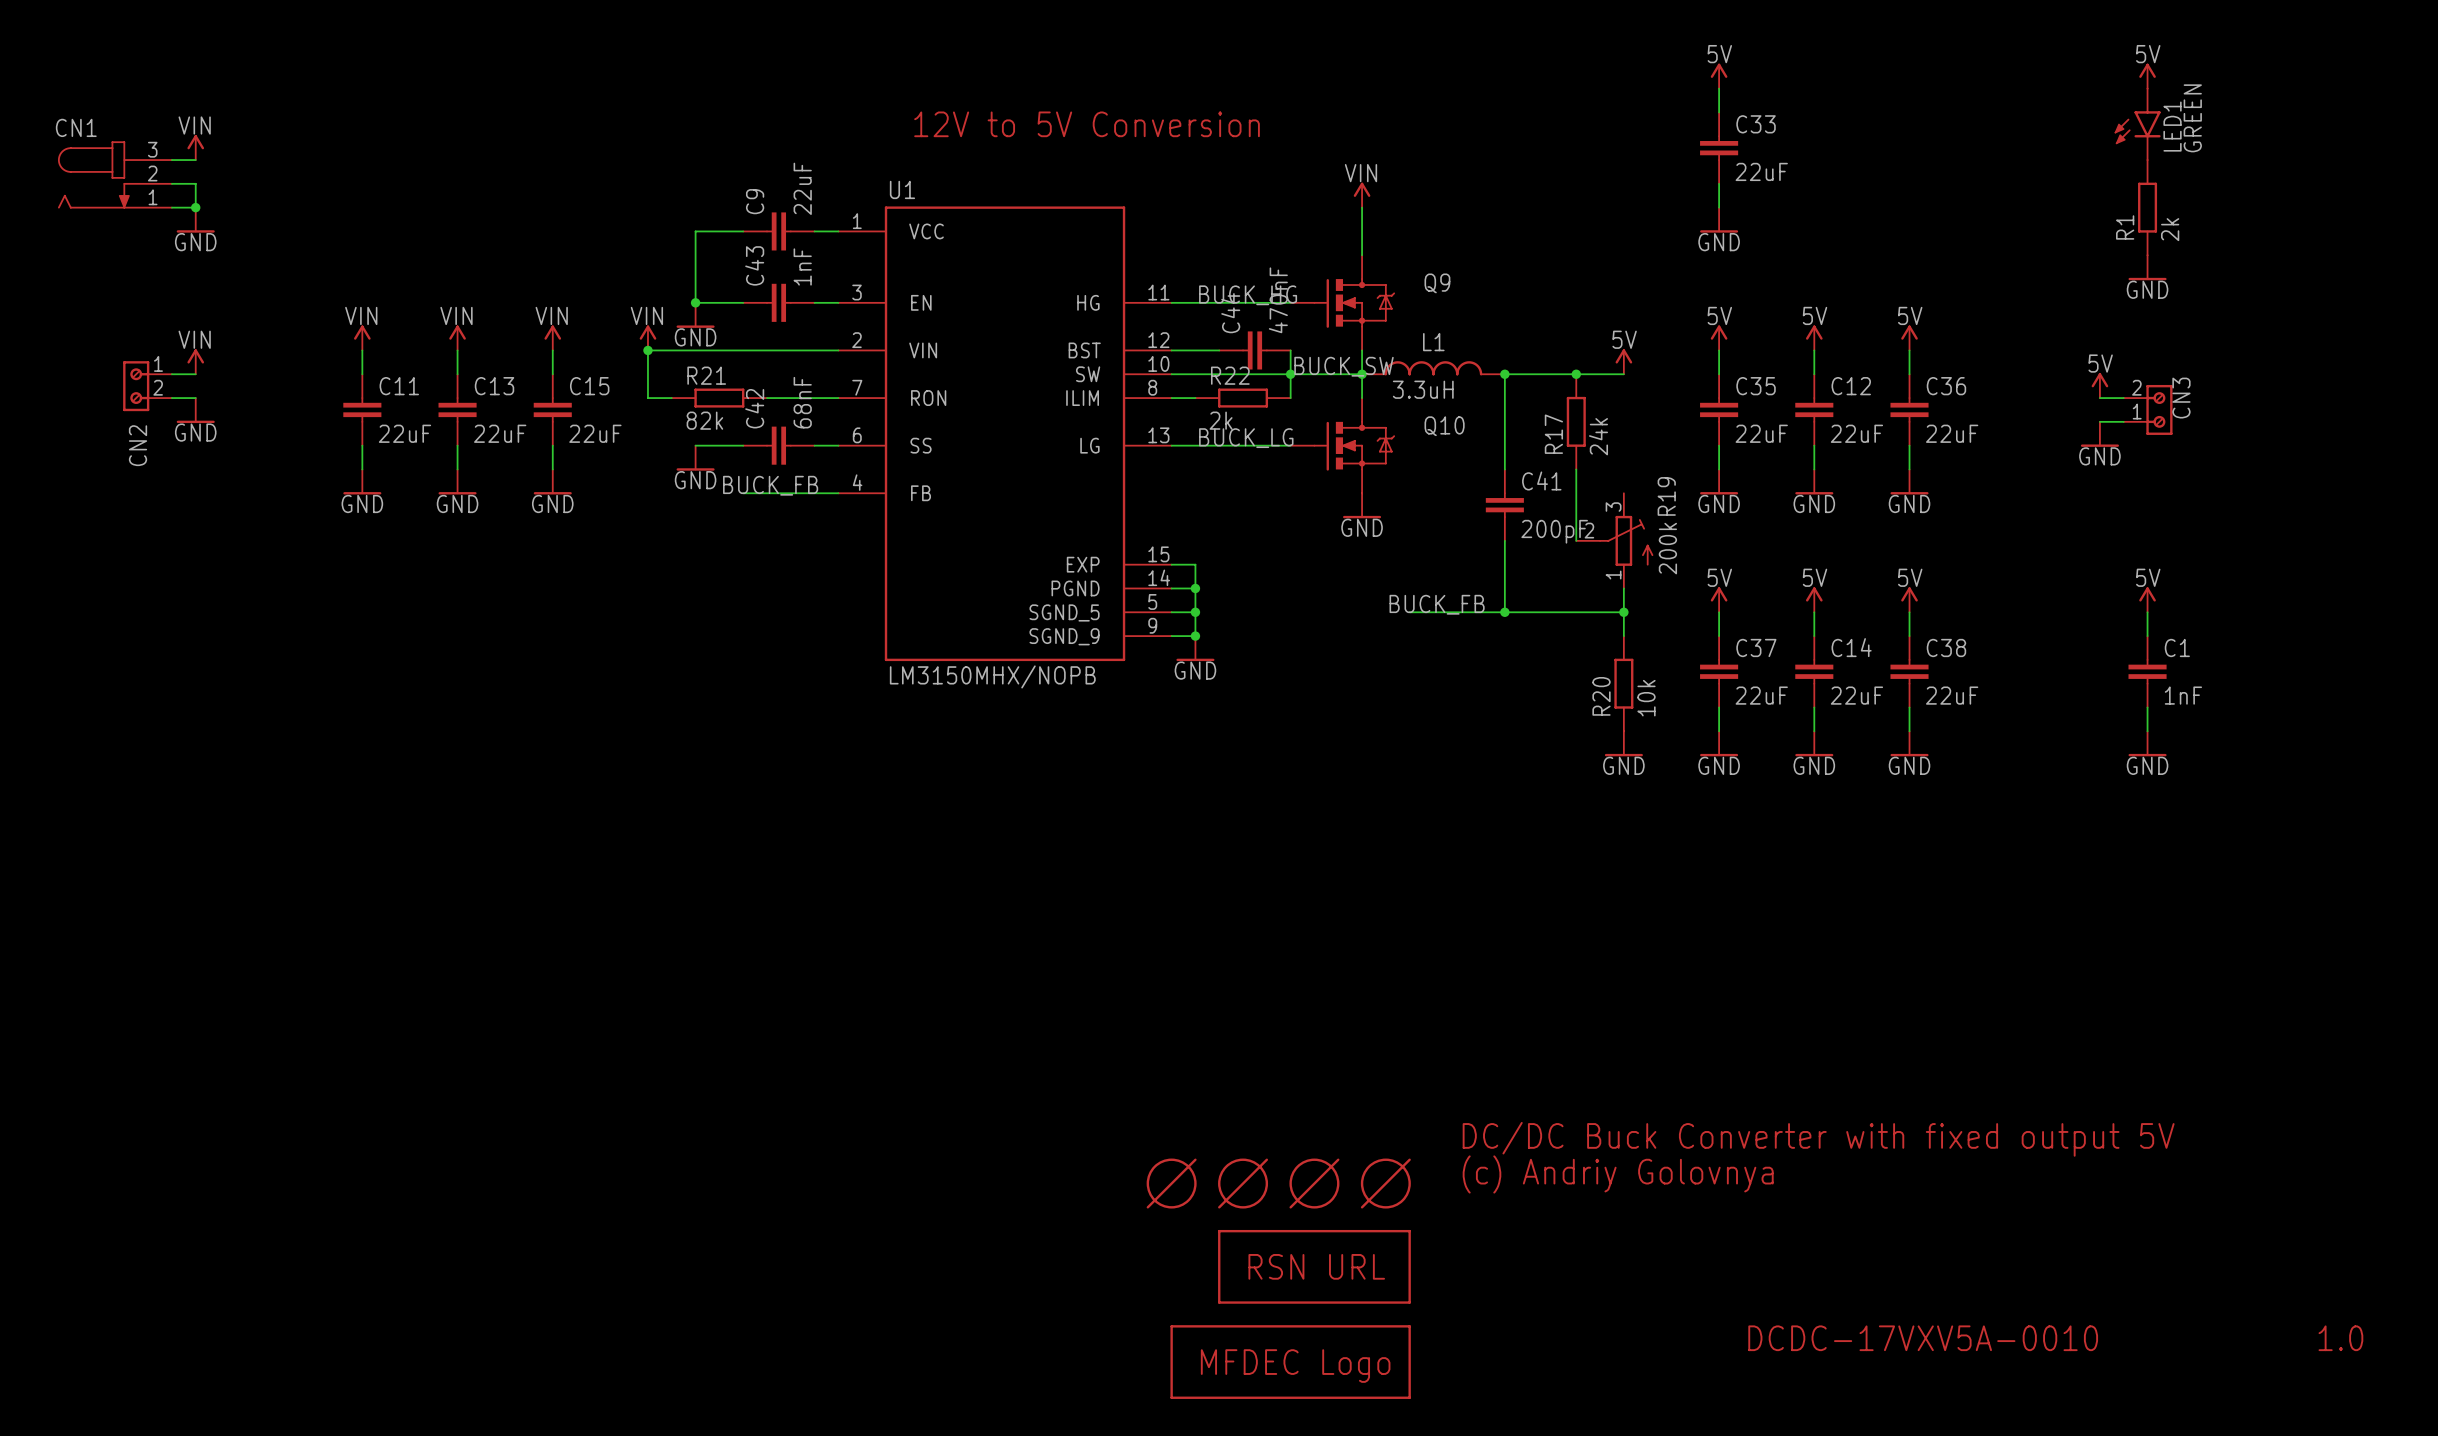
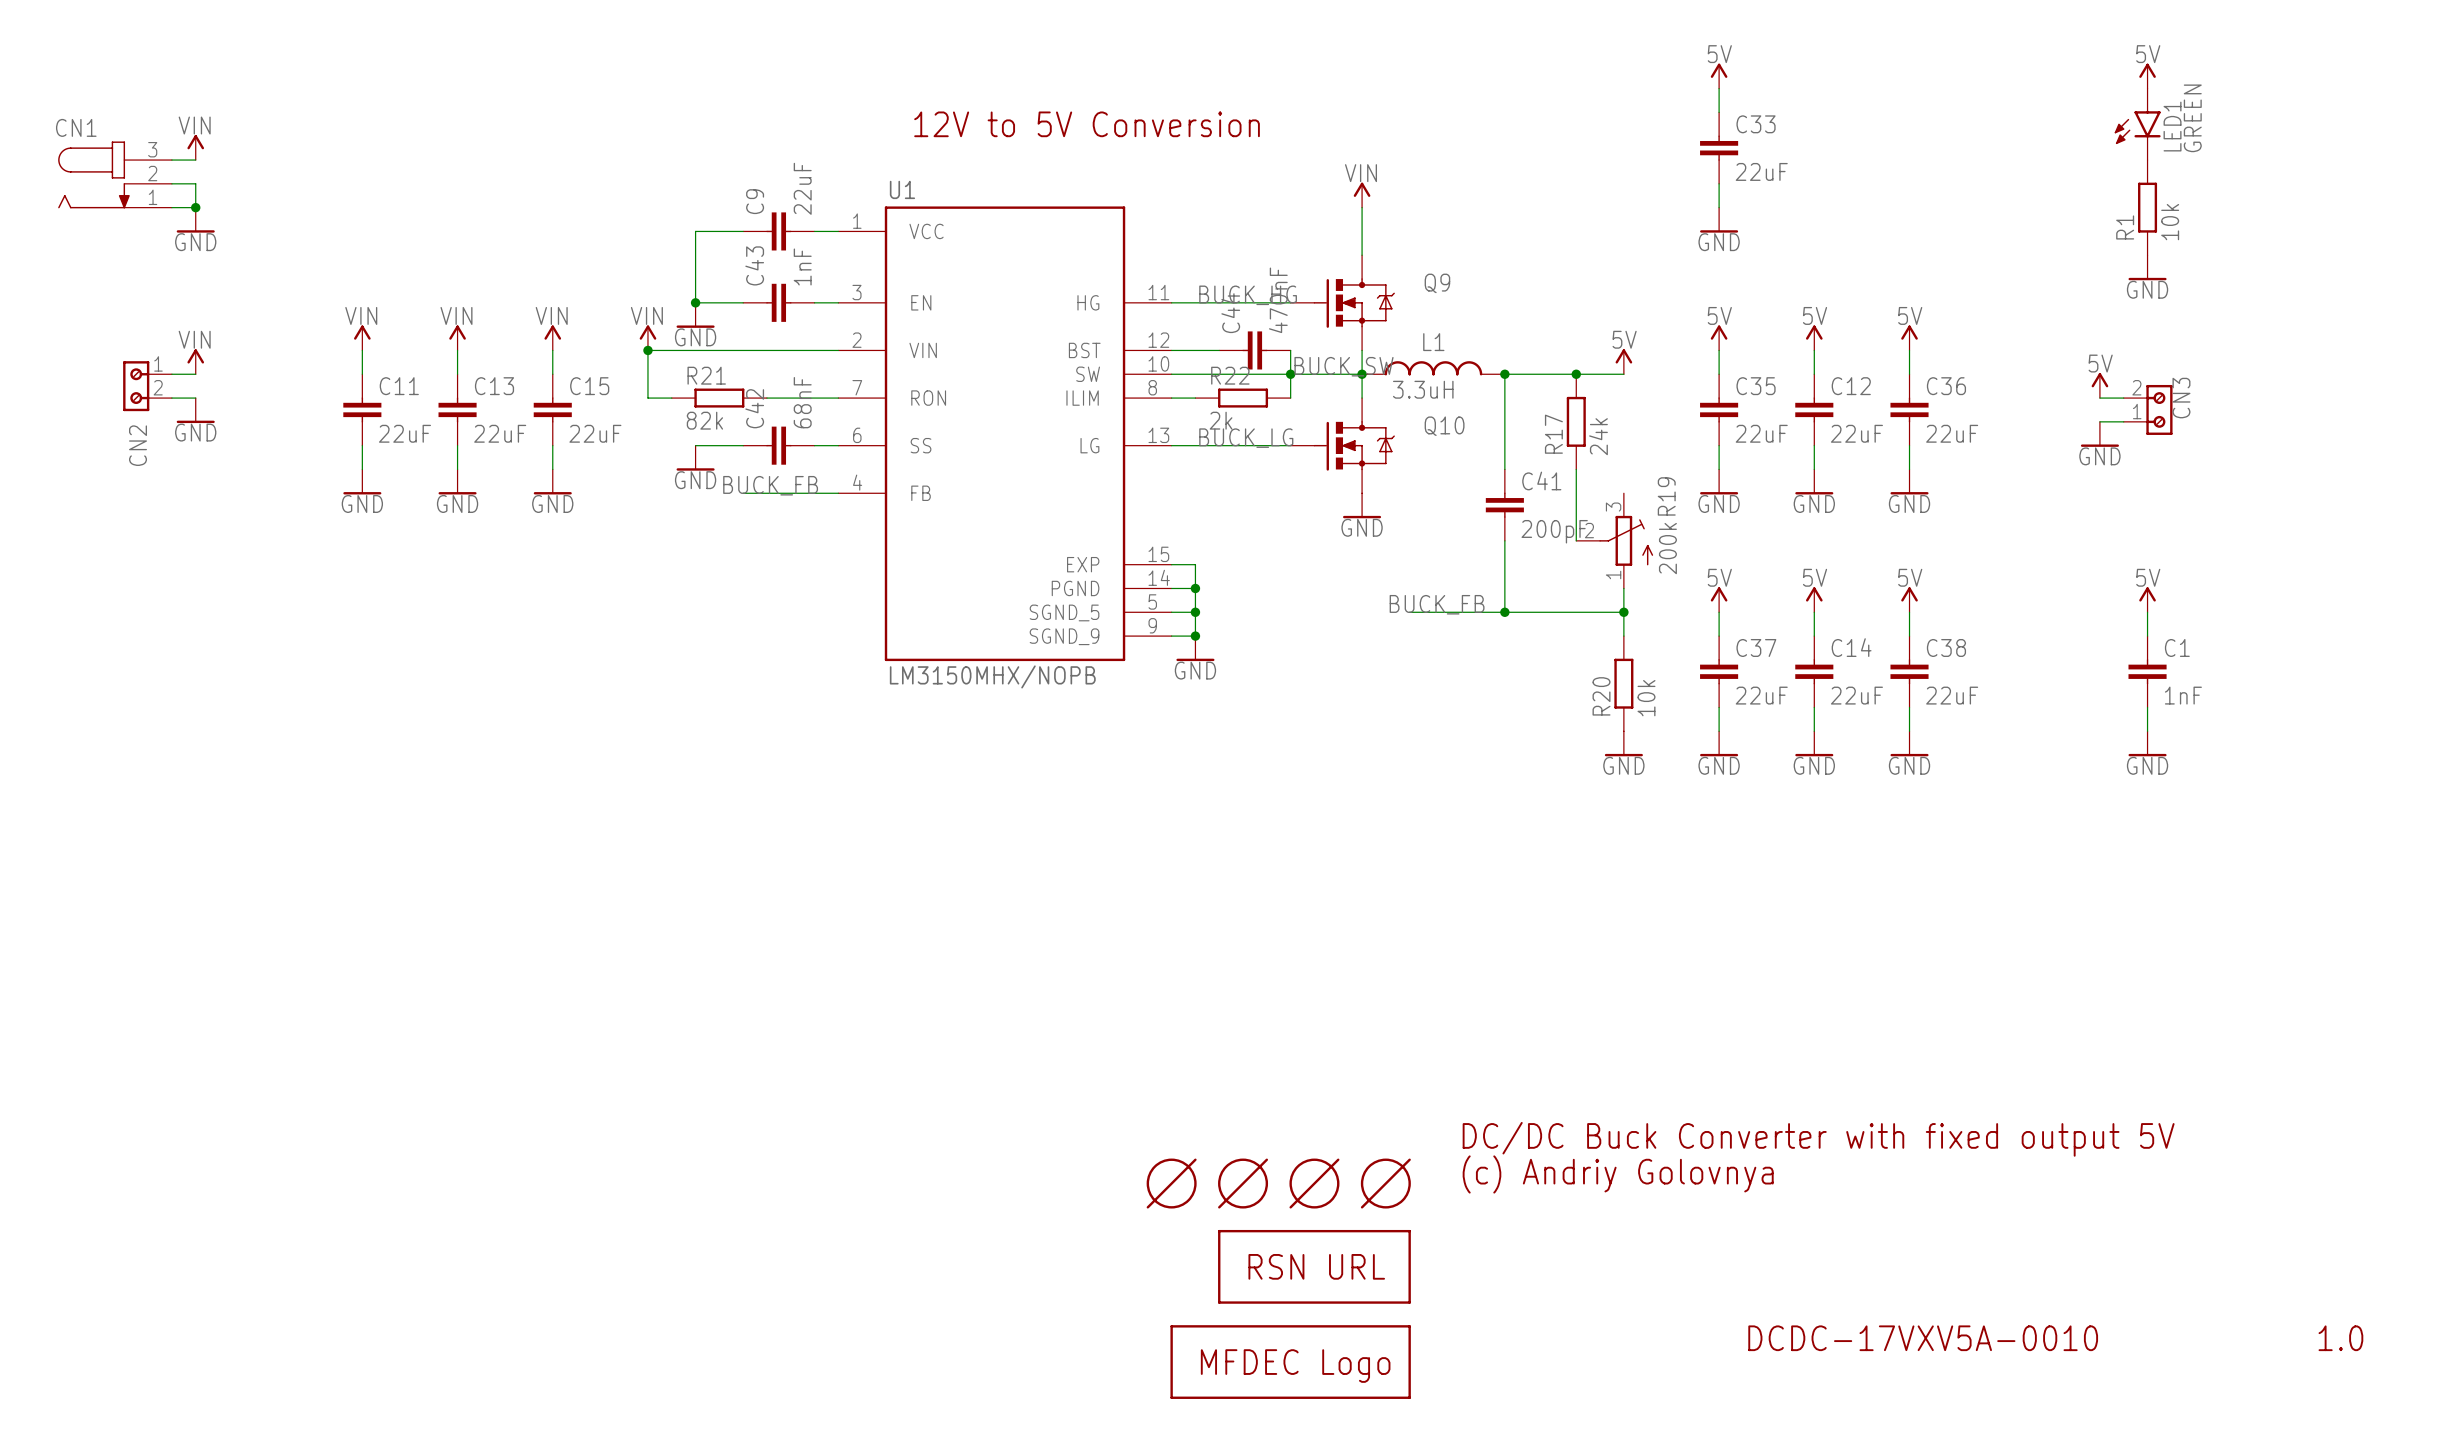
R1 value: 2k (2170, 229) -> 10k (2170, 222)

